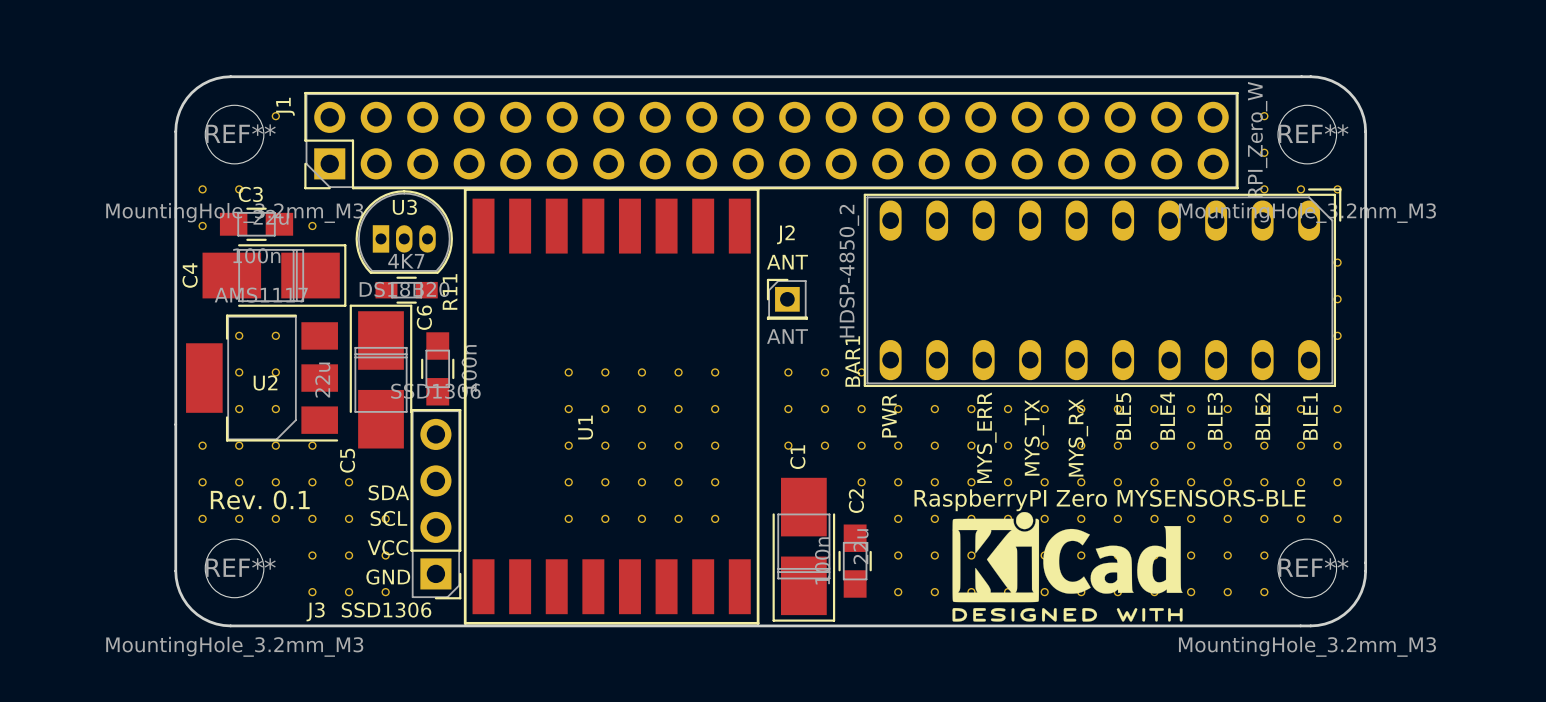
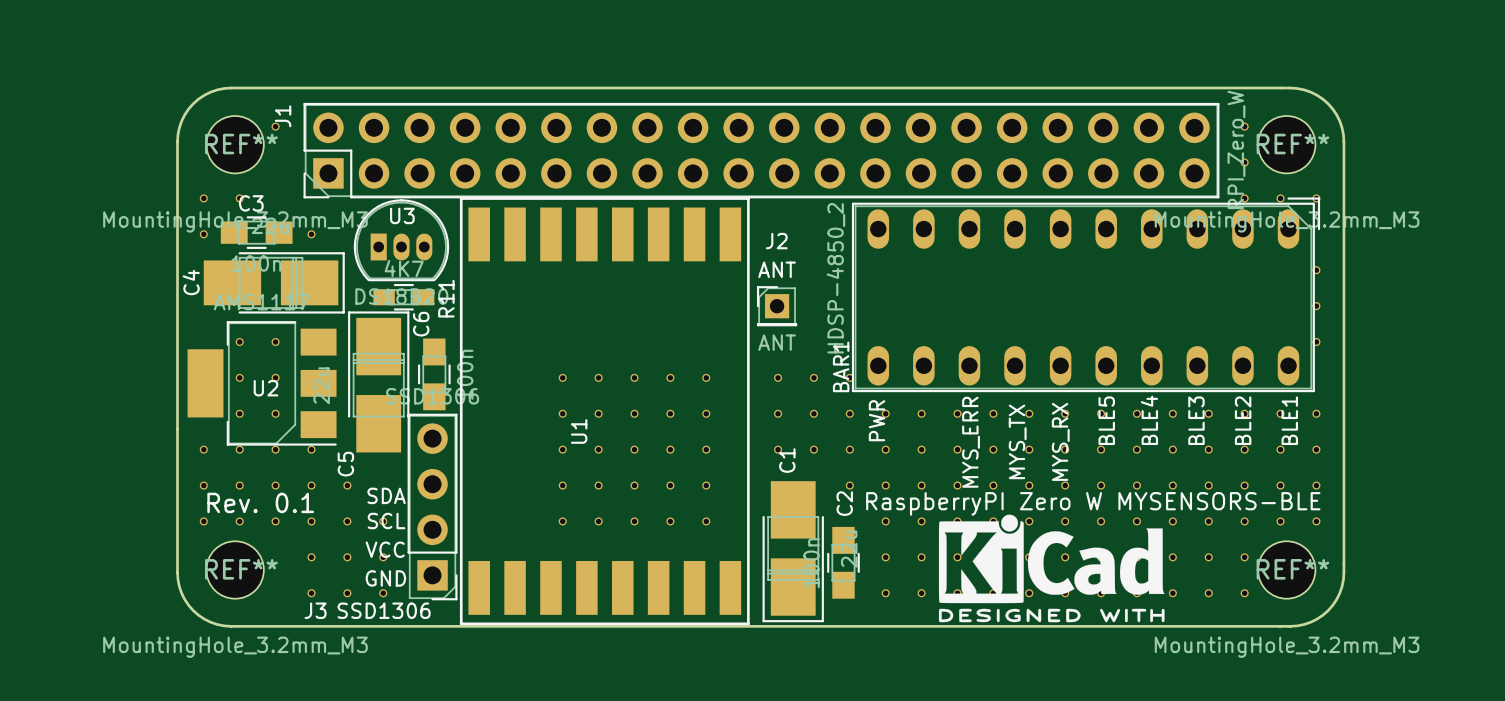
text: RaspberryPI Zero MYSENSORS-BLE (1109, 500) -> RaspberryPI Zero W MYSENSORS-BLE (1093, 503)

